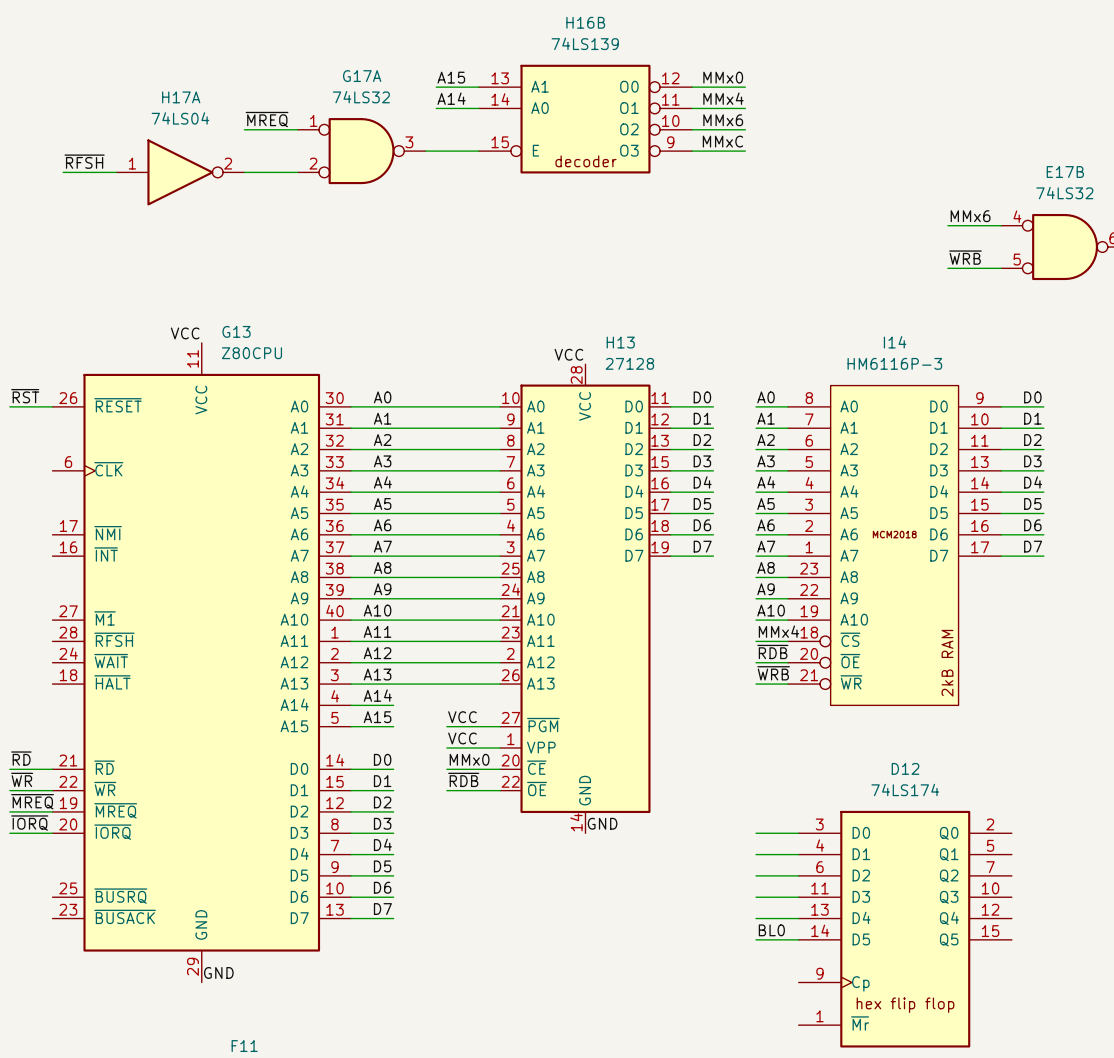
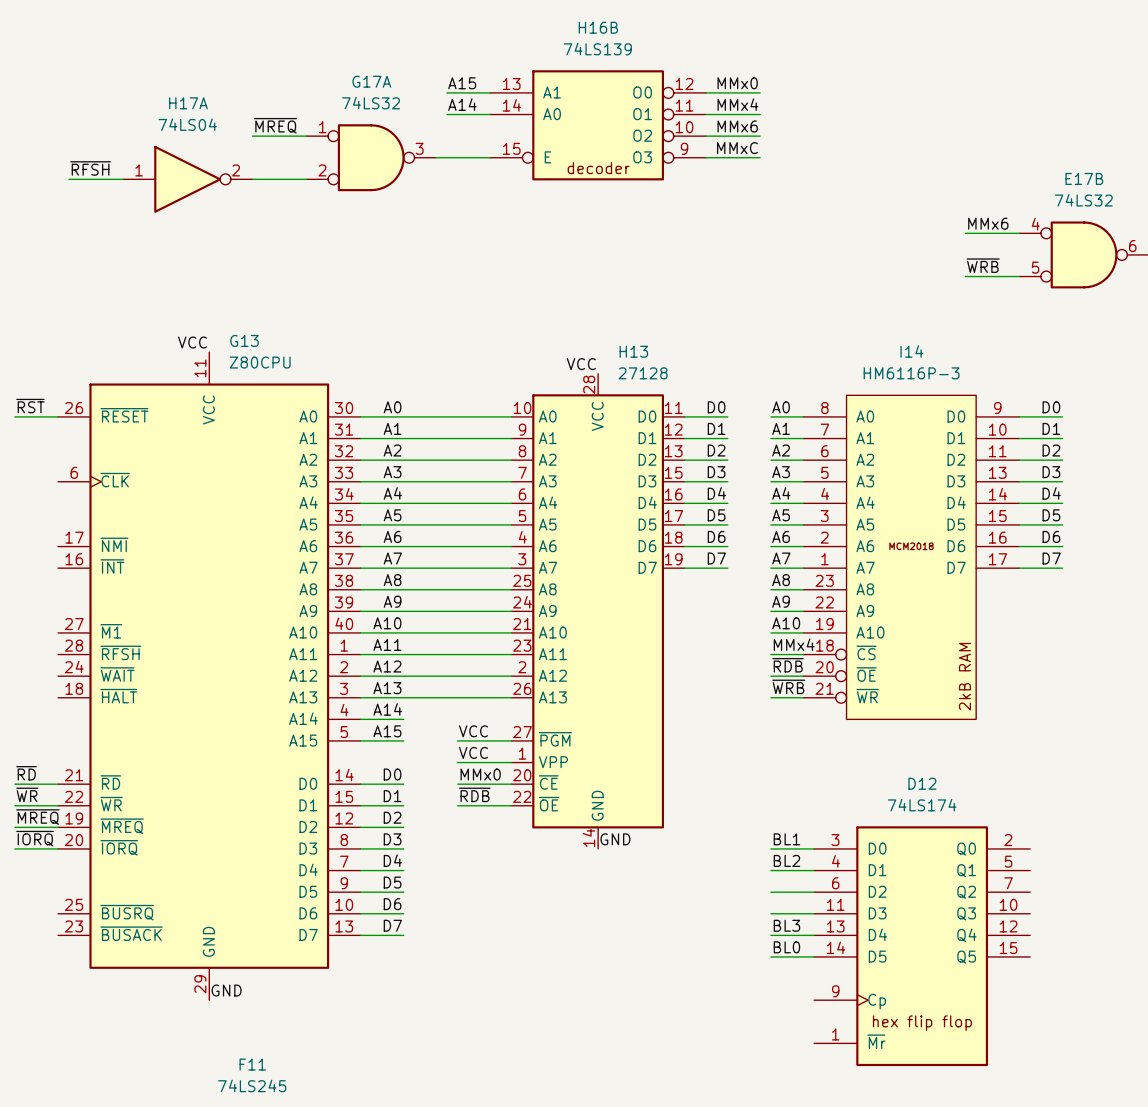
label: none -> BL1 (786, 839)
label: none -> BL2 (786, 860)
label: none -> BL3 (786, 925)

